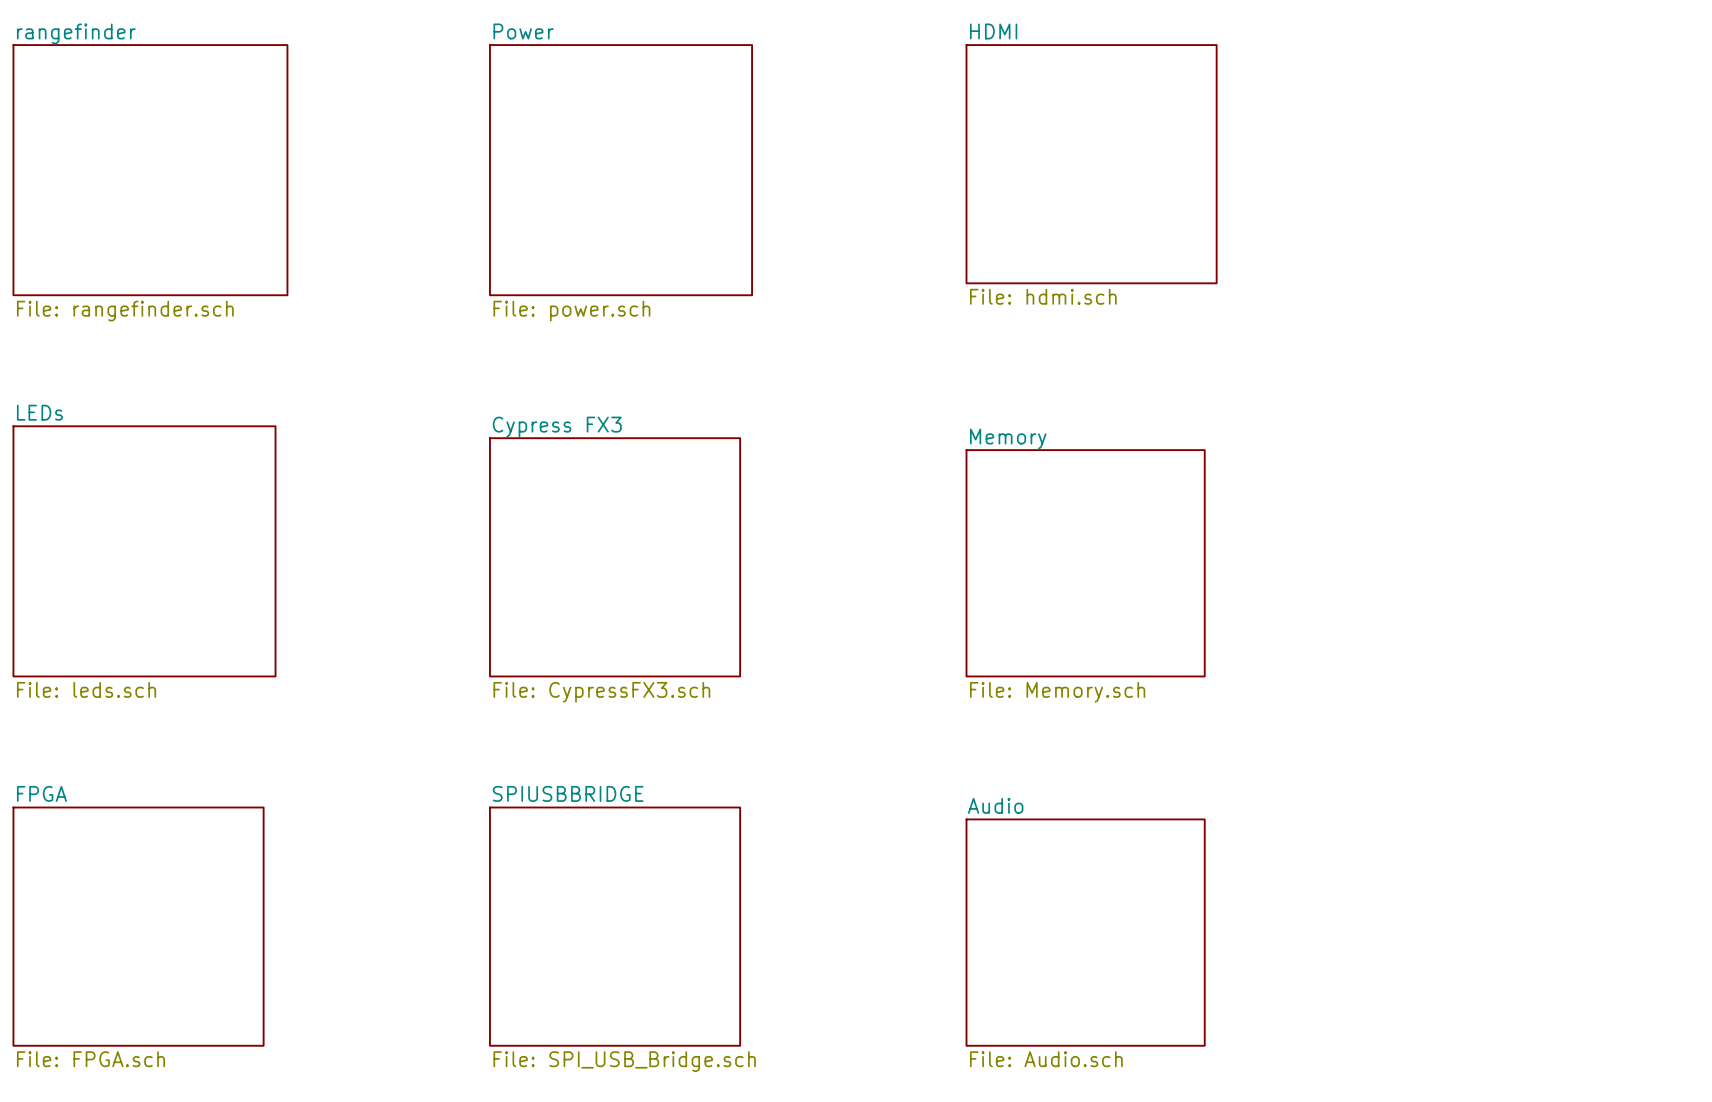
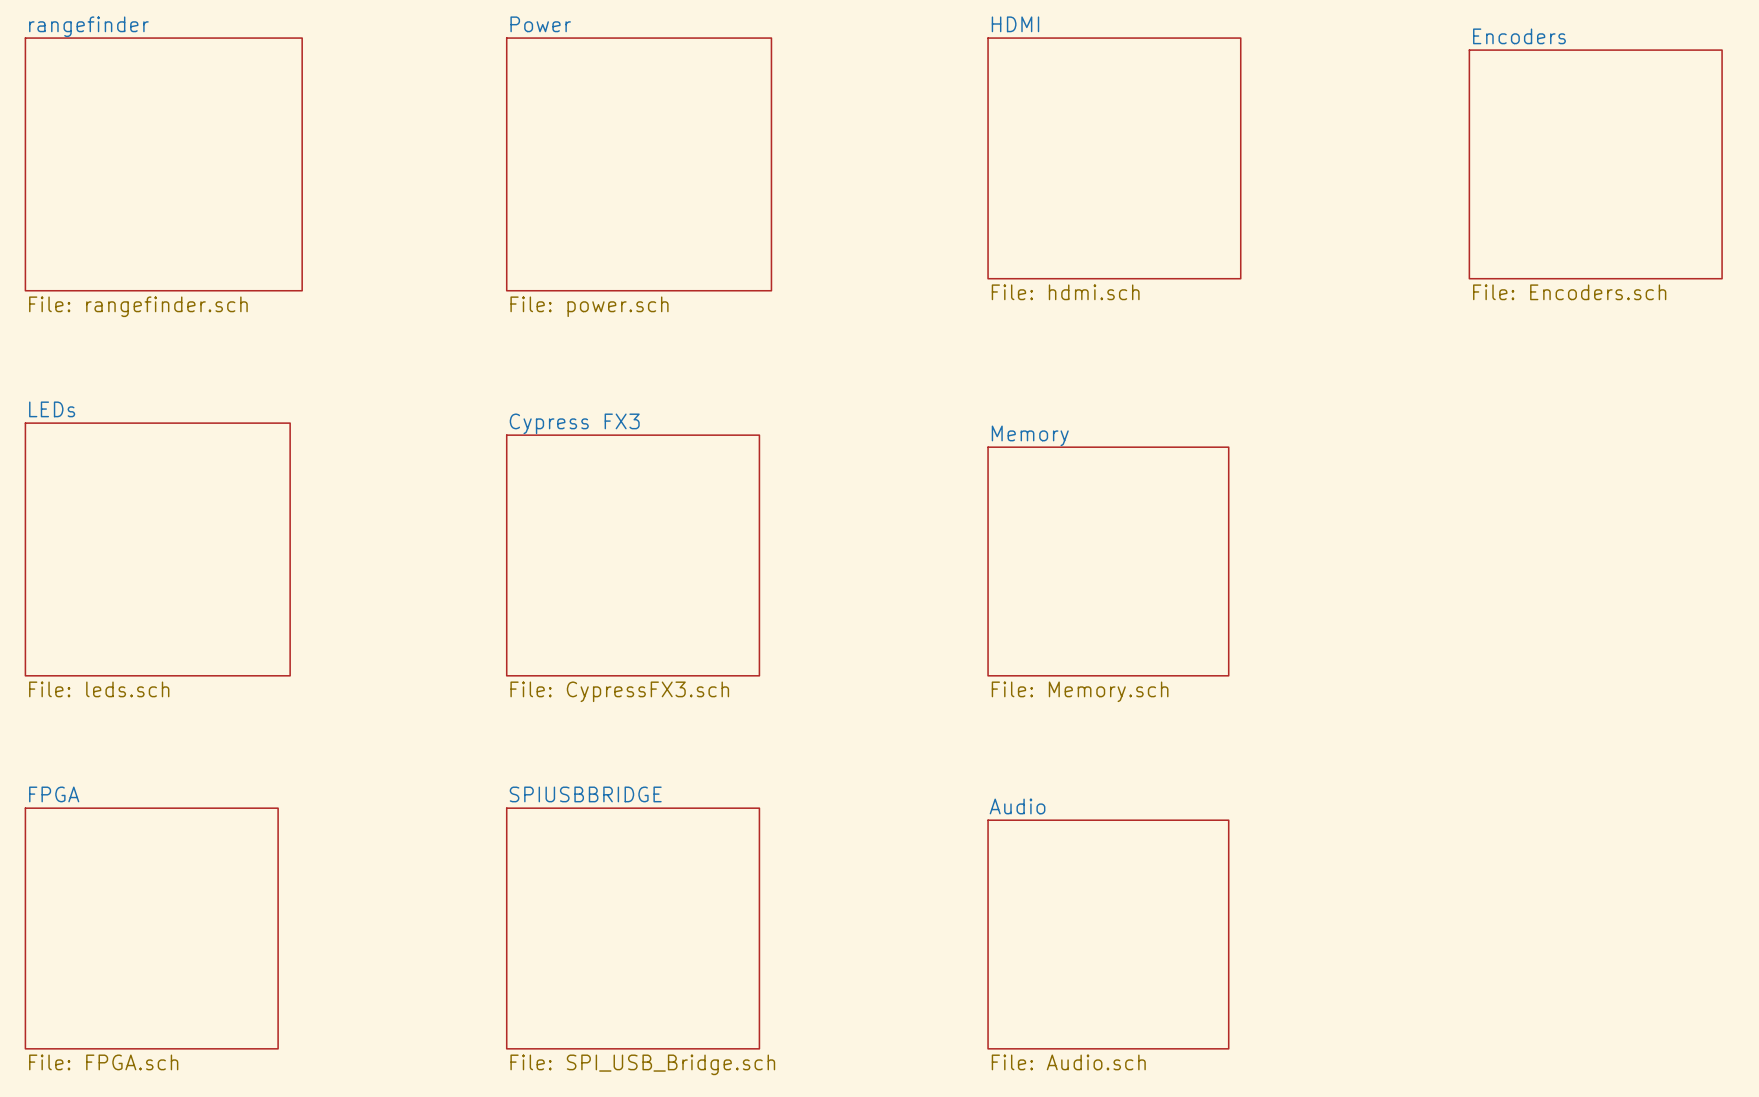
sheet Encoders: none -> File: Encoders.sch (1595, 164)

